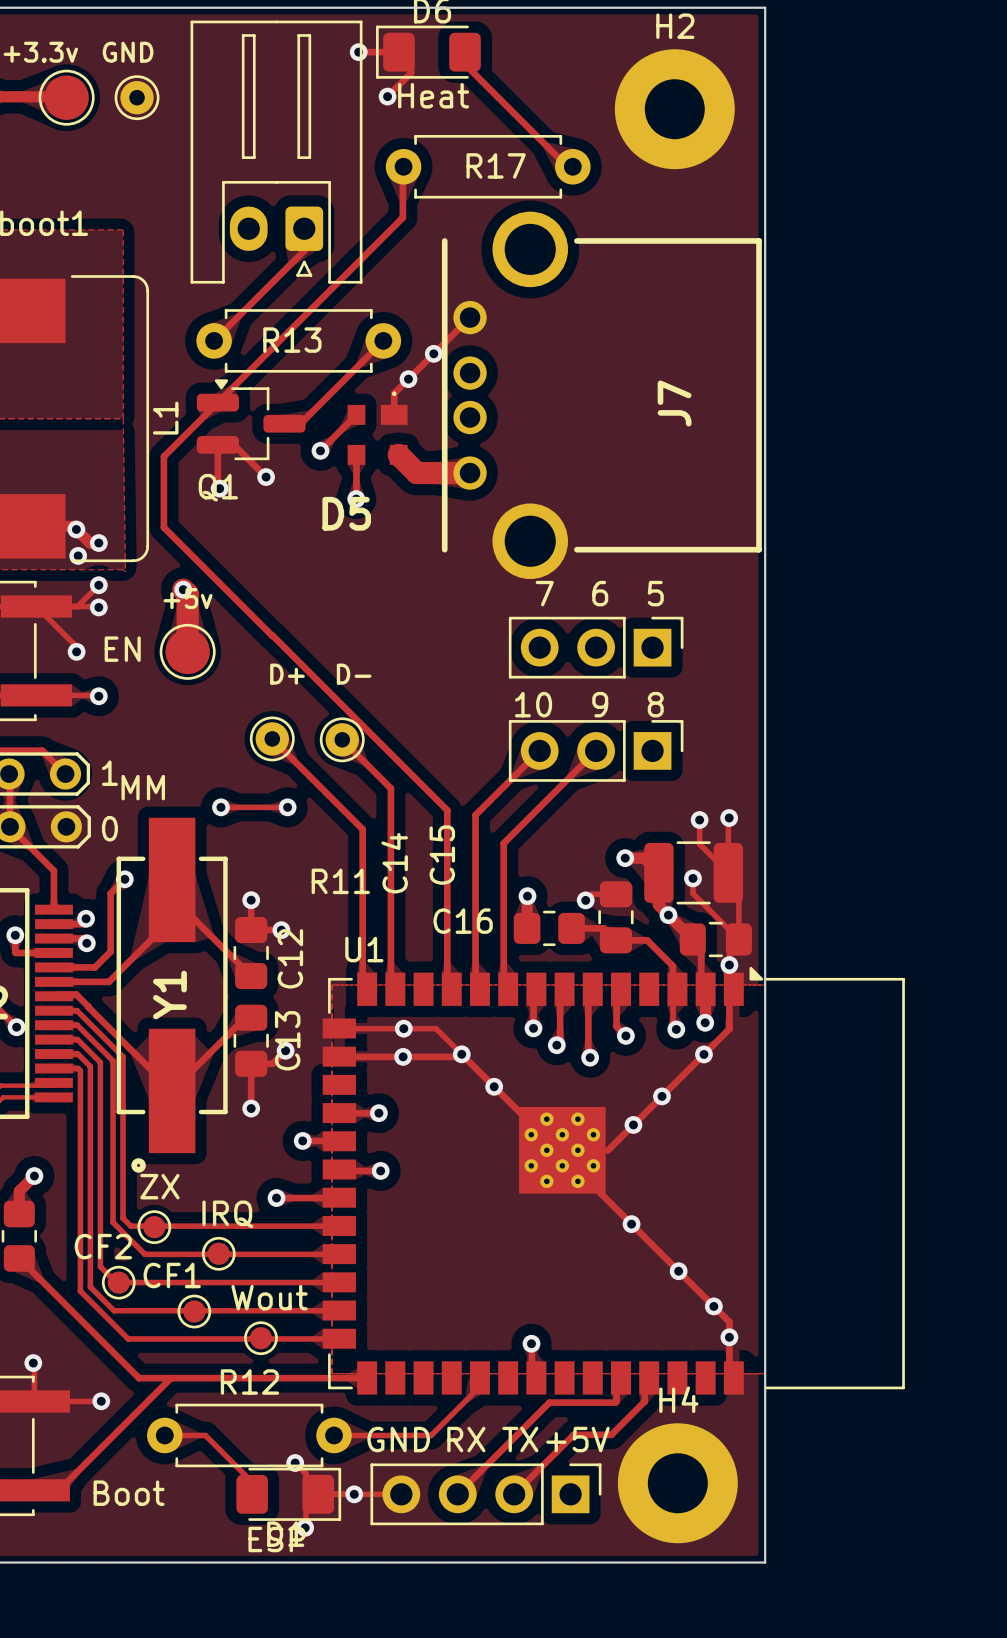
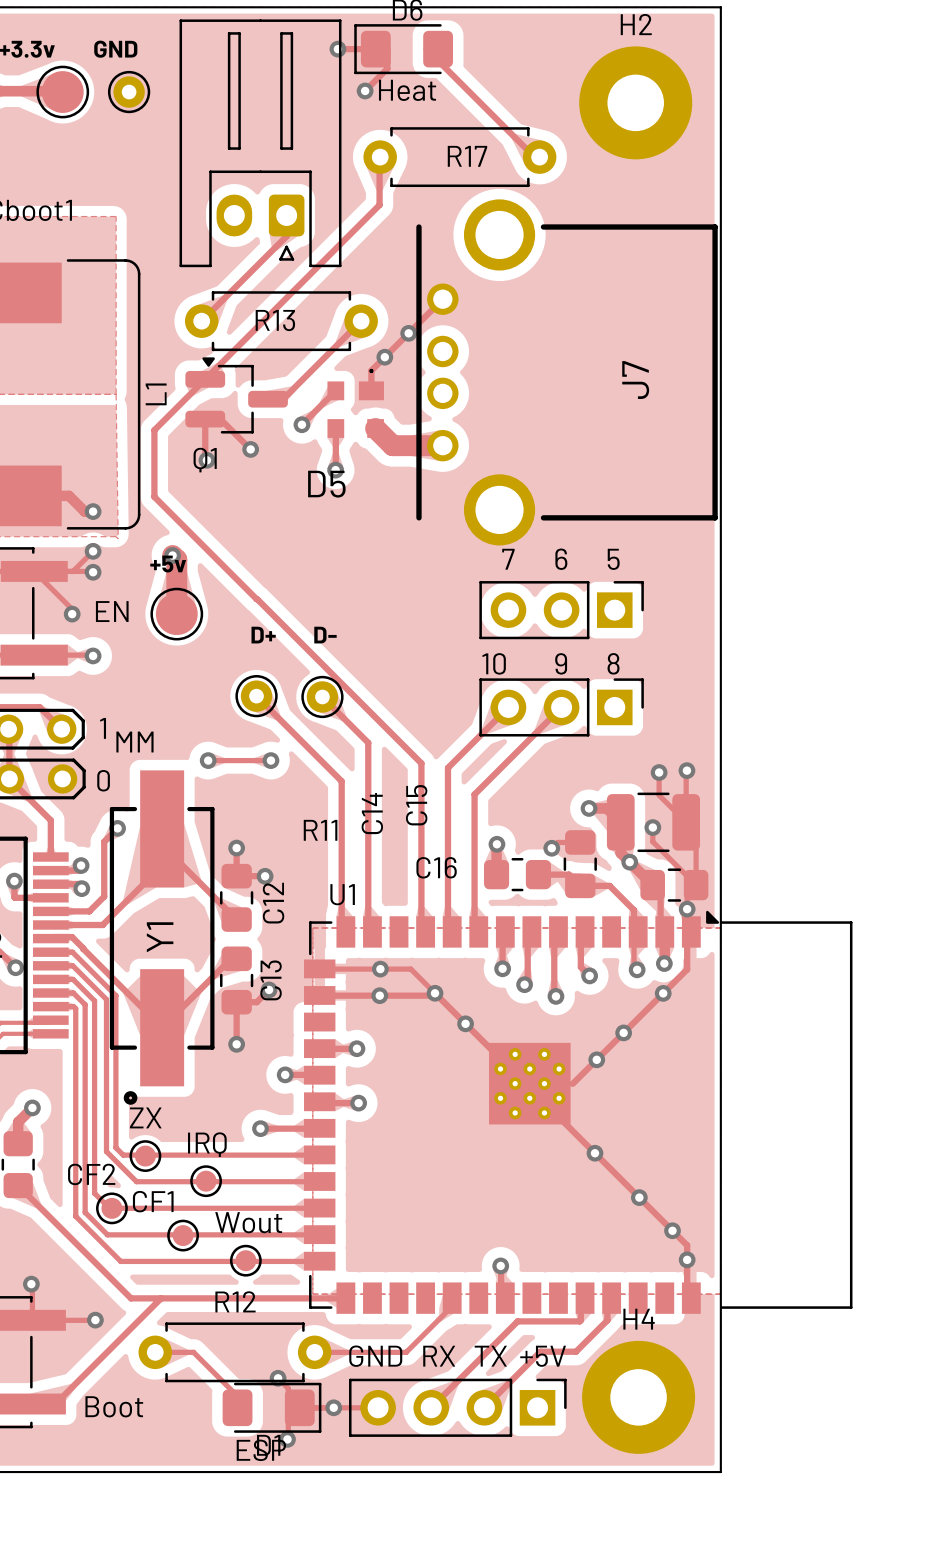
via: (76, 529) -> none
via: (78, 555) -> none

